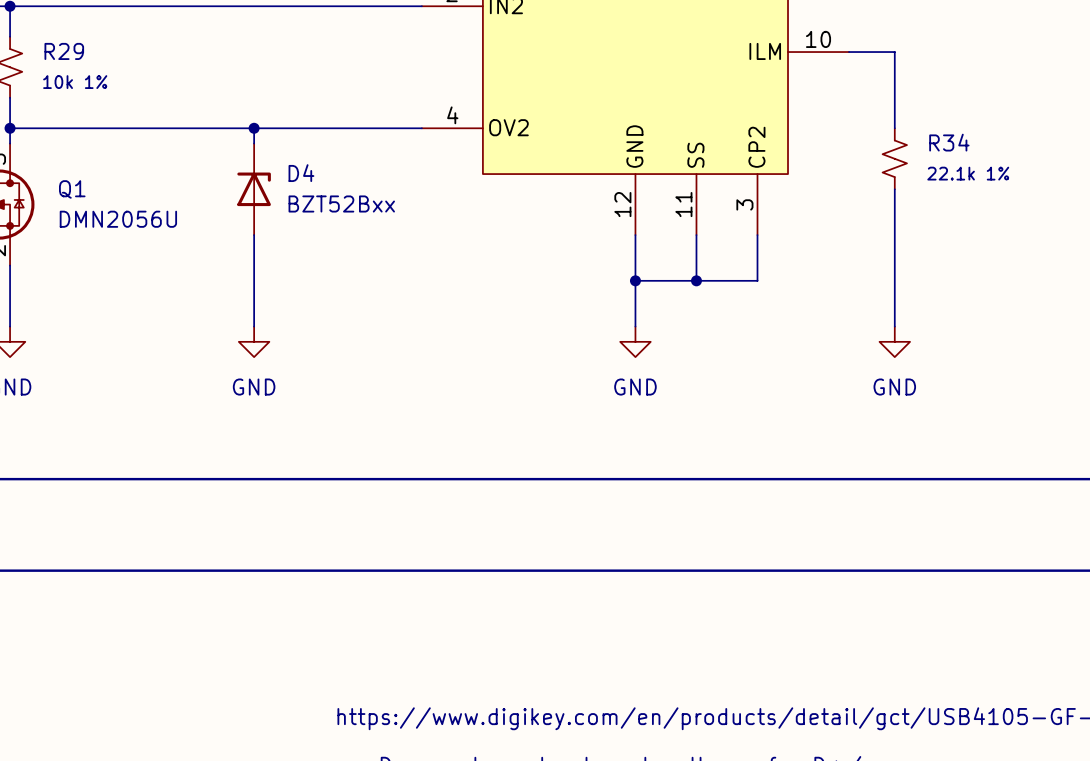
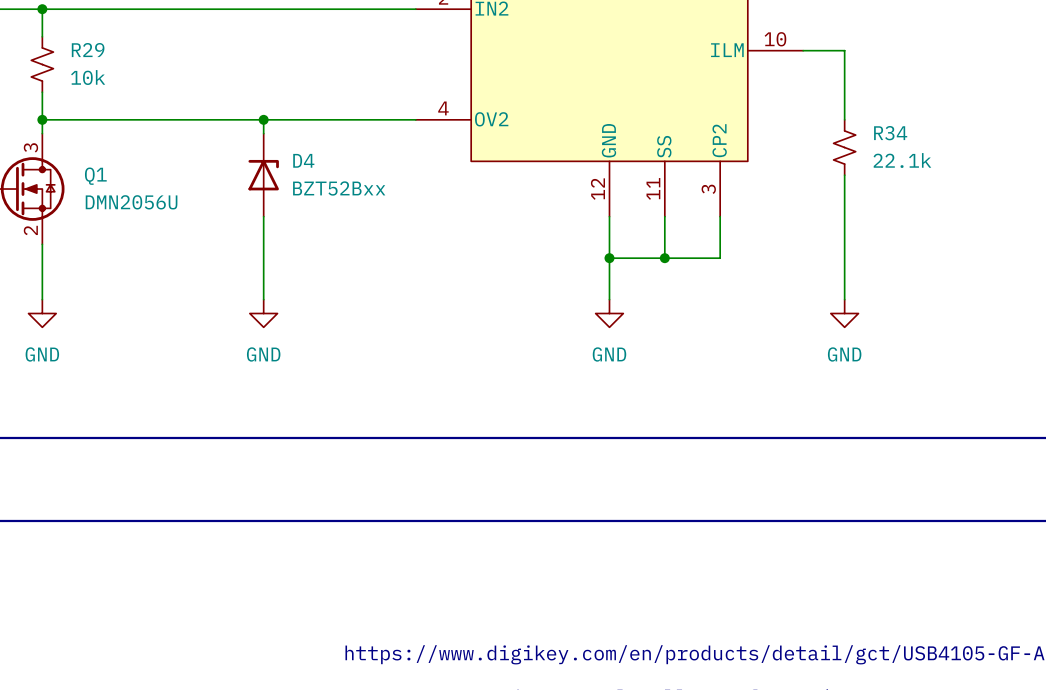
R29 value: 10k 1% (75, 82) -> 10k (88, 77)
R34 value: 22.1k 1% (968, 173) -> 22.1k (902, 160)

